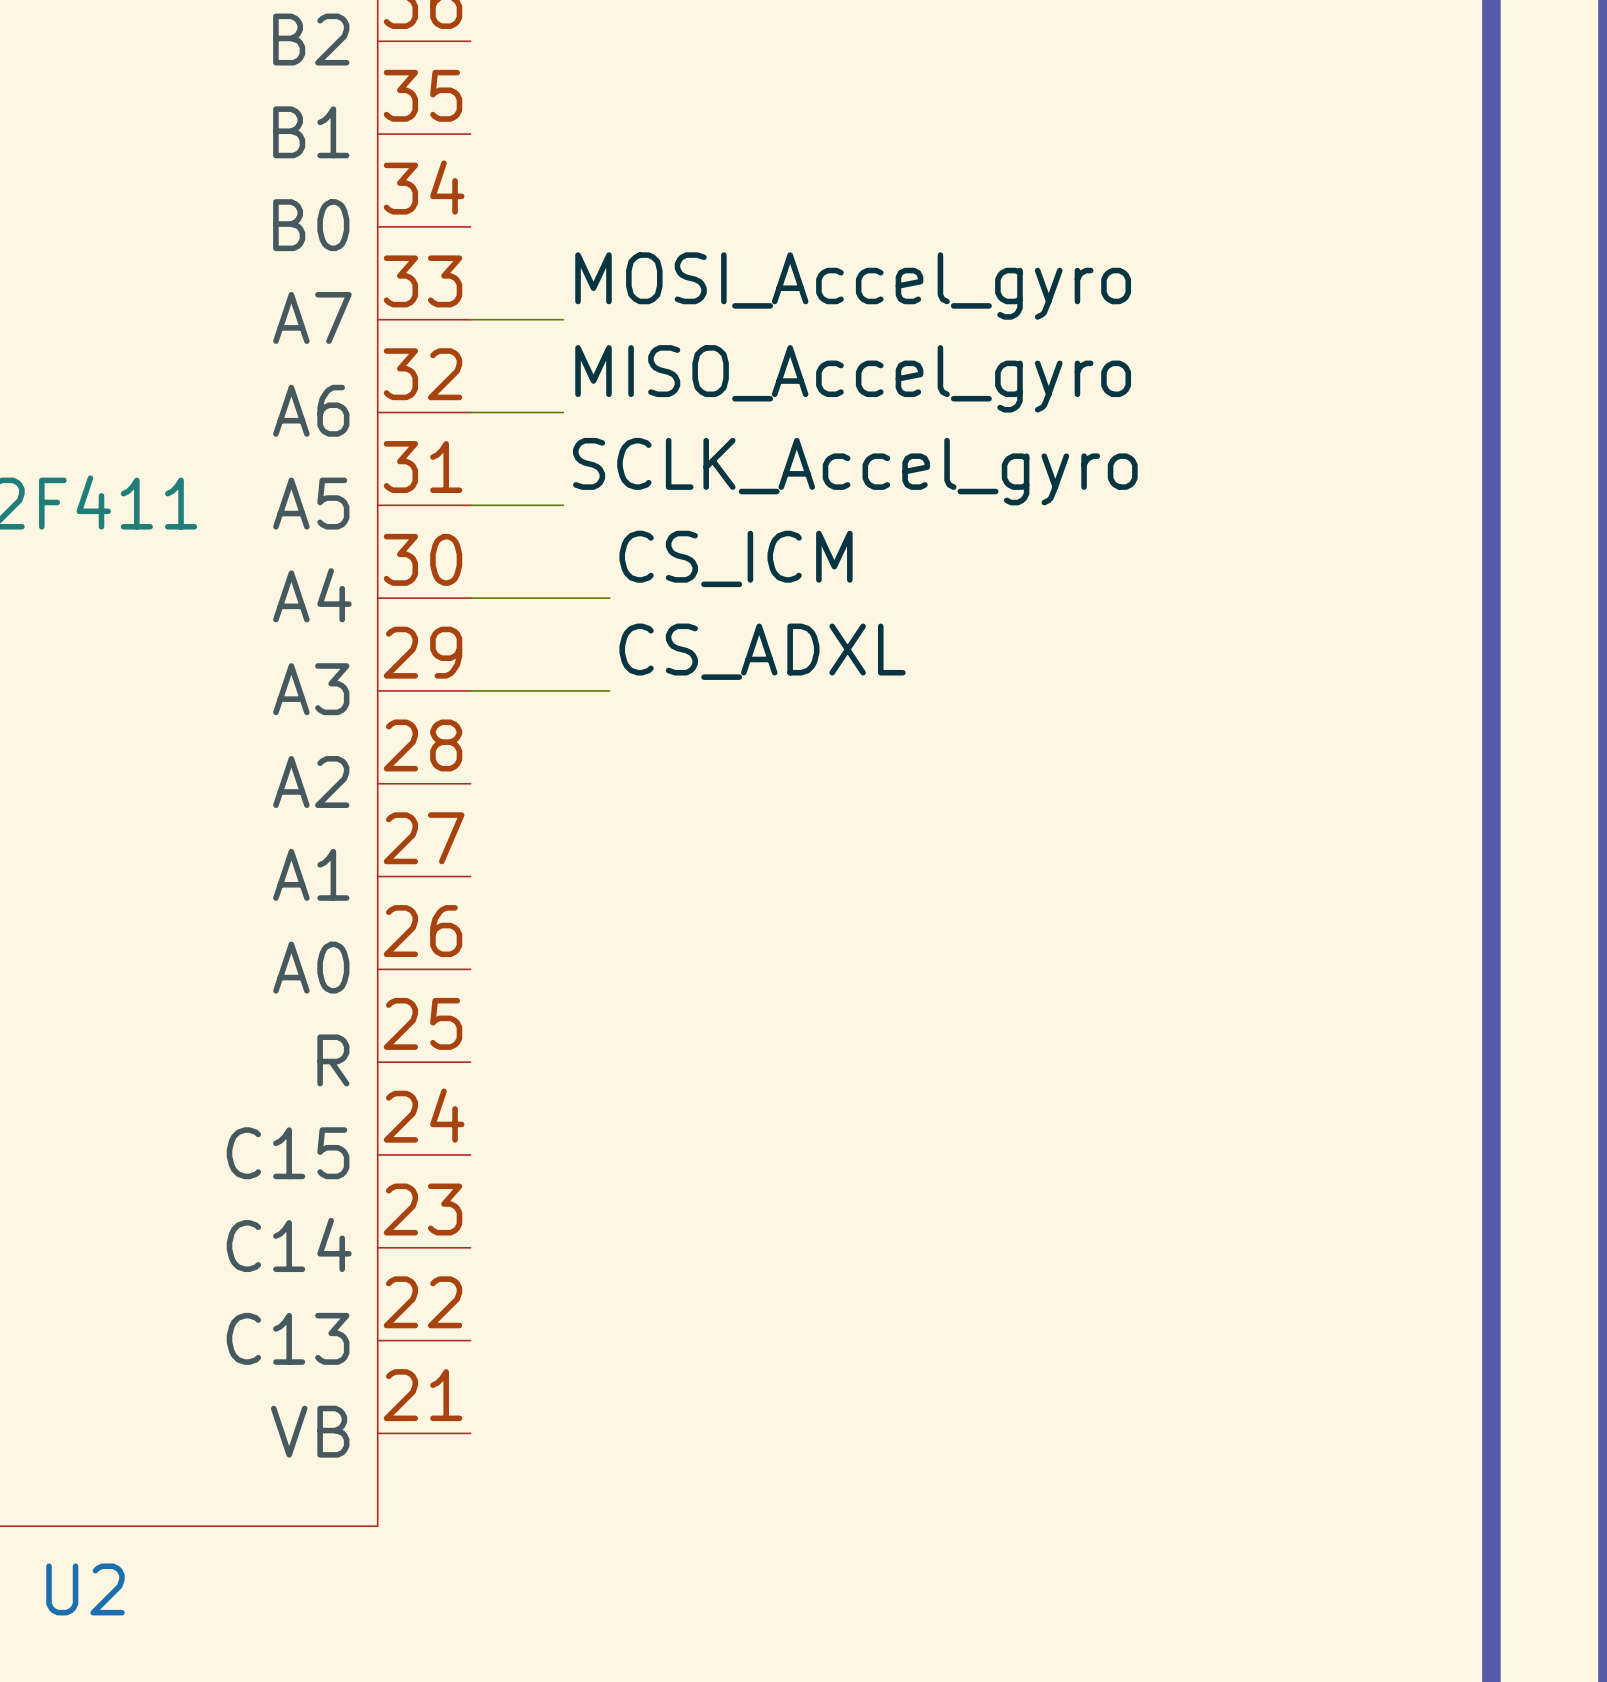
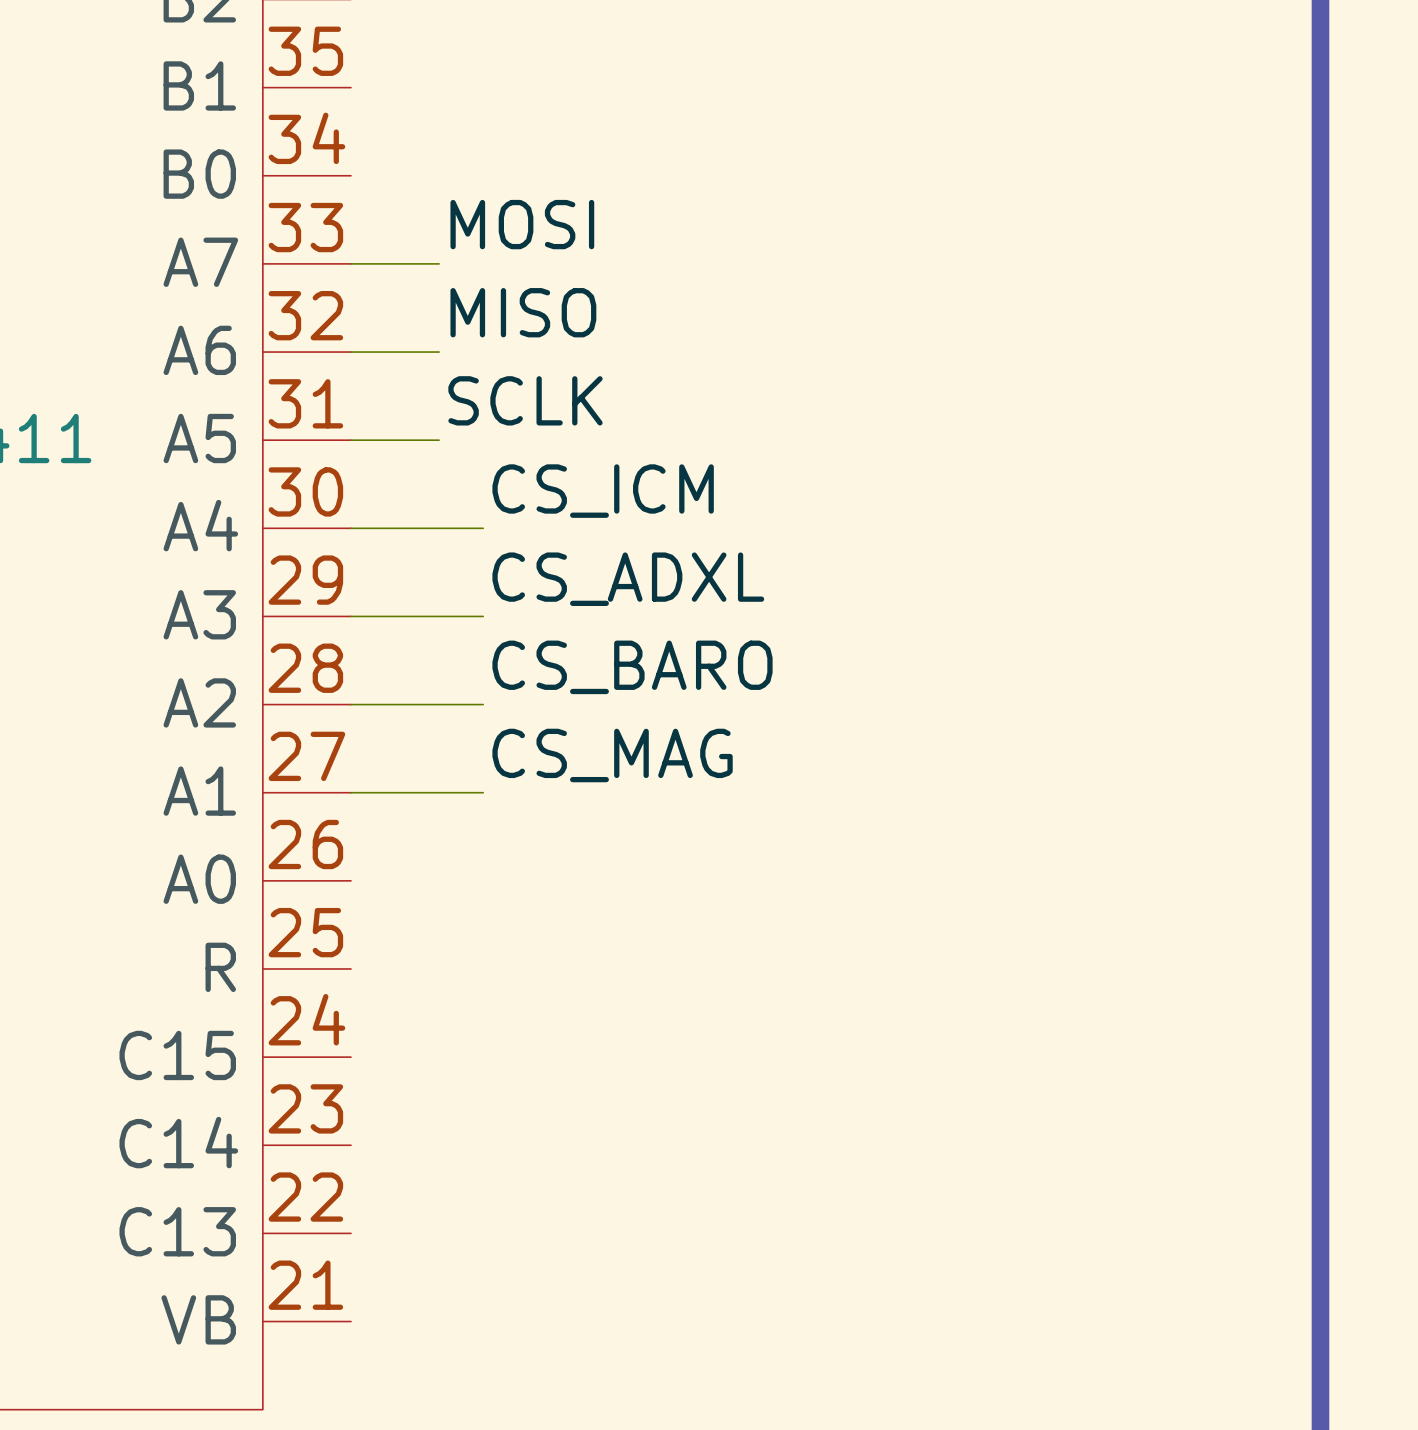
label: MOSI_Accel_gyro (853, 286) -> MOSI (522, 224)
label: MISO_Accel_gyro (853, 378) -> MISO (523, 312)
label: SCLK_Accel_gyro (855, 471) -> SCLK (525, 400)
label: none -> CS_BARO (632, 667)
wire: none -> (350, 704) (483, 704)
label: none -> CS_MAG (612, 755)
wire: none -> (350, 792) (483, 792)

